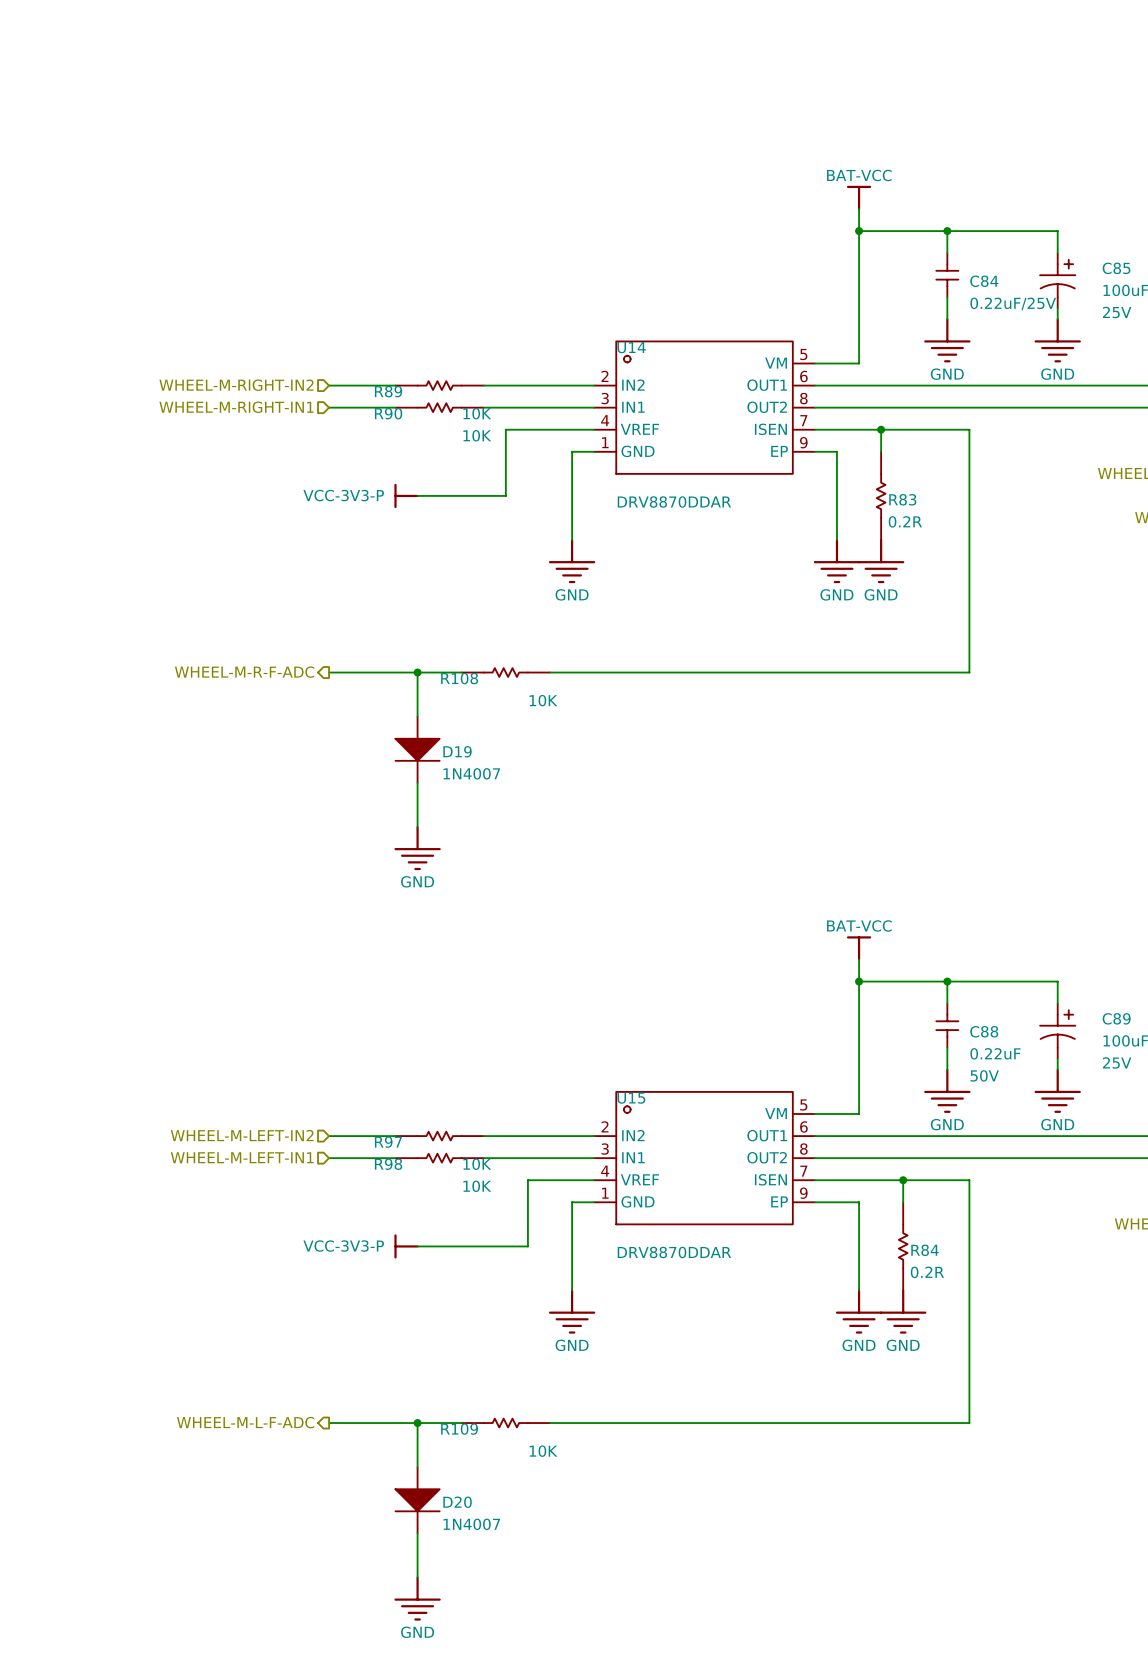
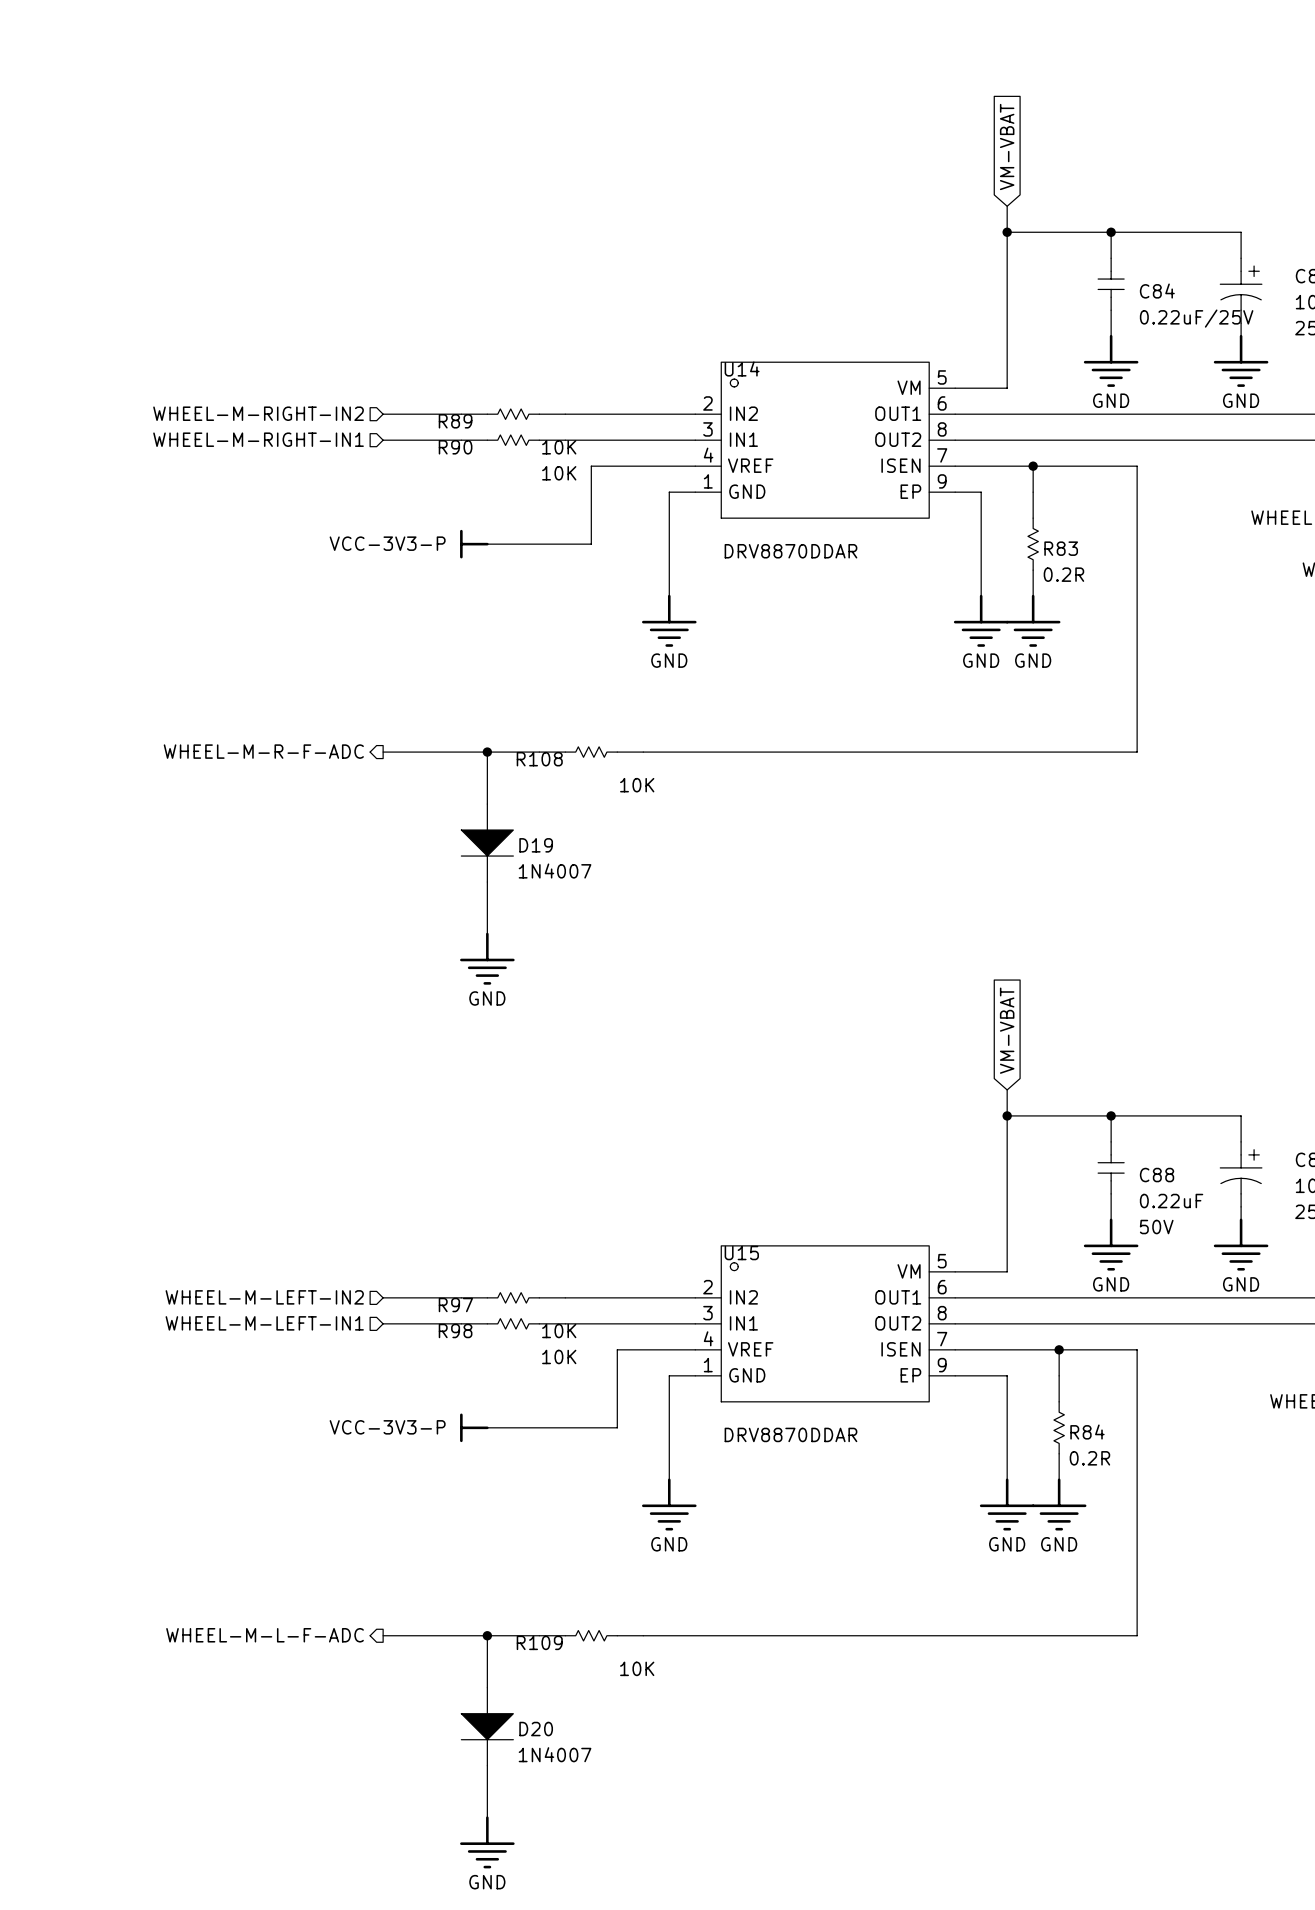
global label: none -> VM-VBAT (1007, 146)
power symbol: BAT-VCC (859, 197) -> none
global label: none -> VM-VBAT (1007, 1030)
power symbol: BAT-VCC (859, 948) -> none

